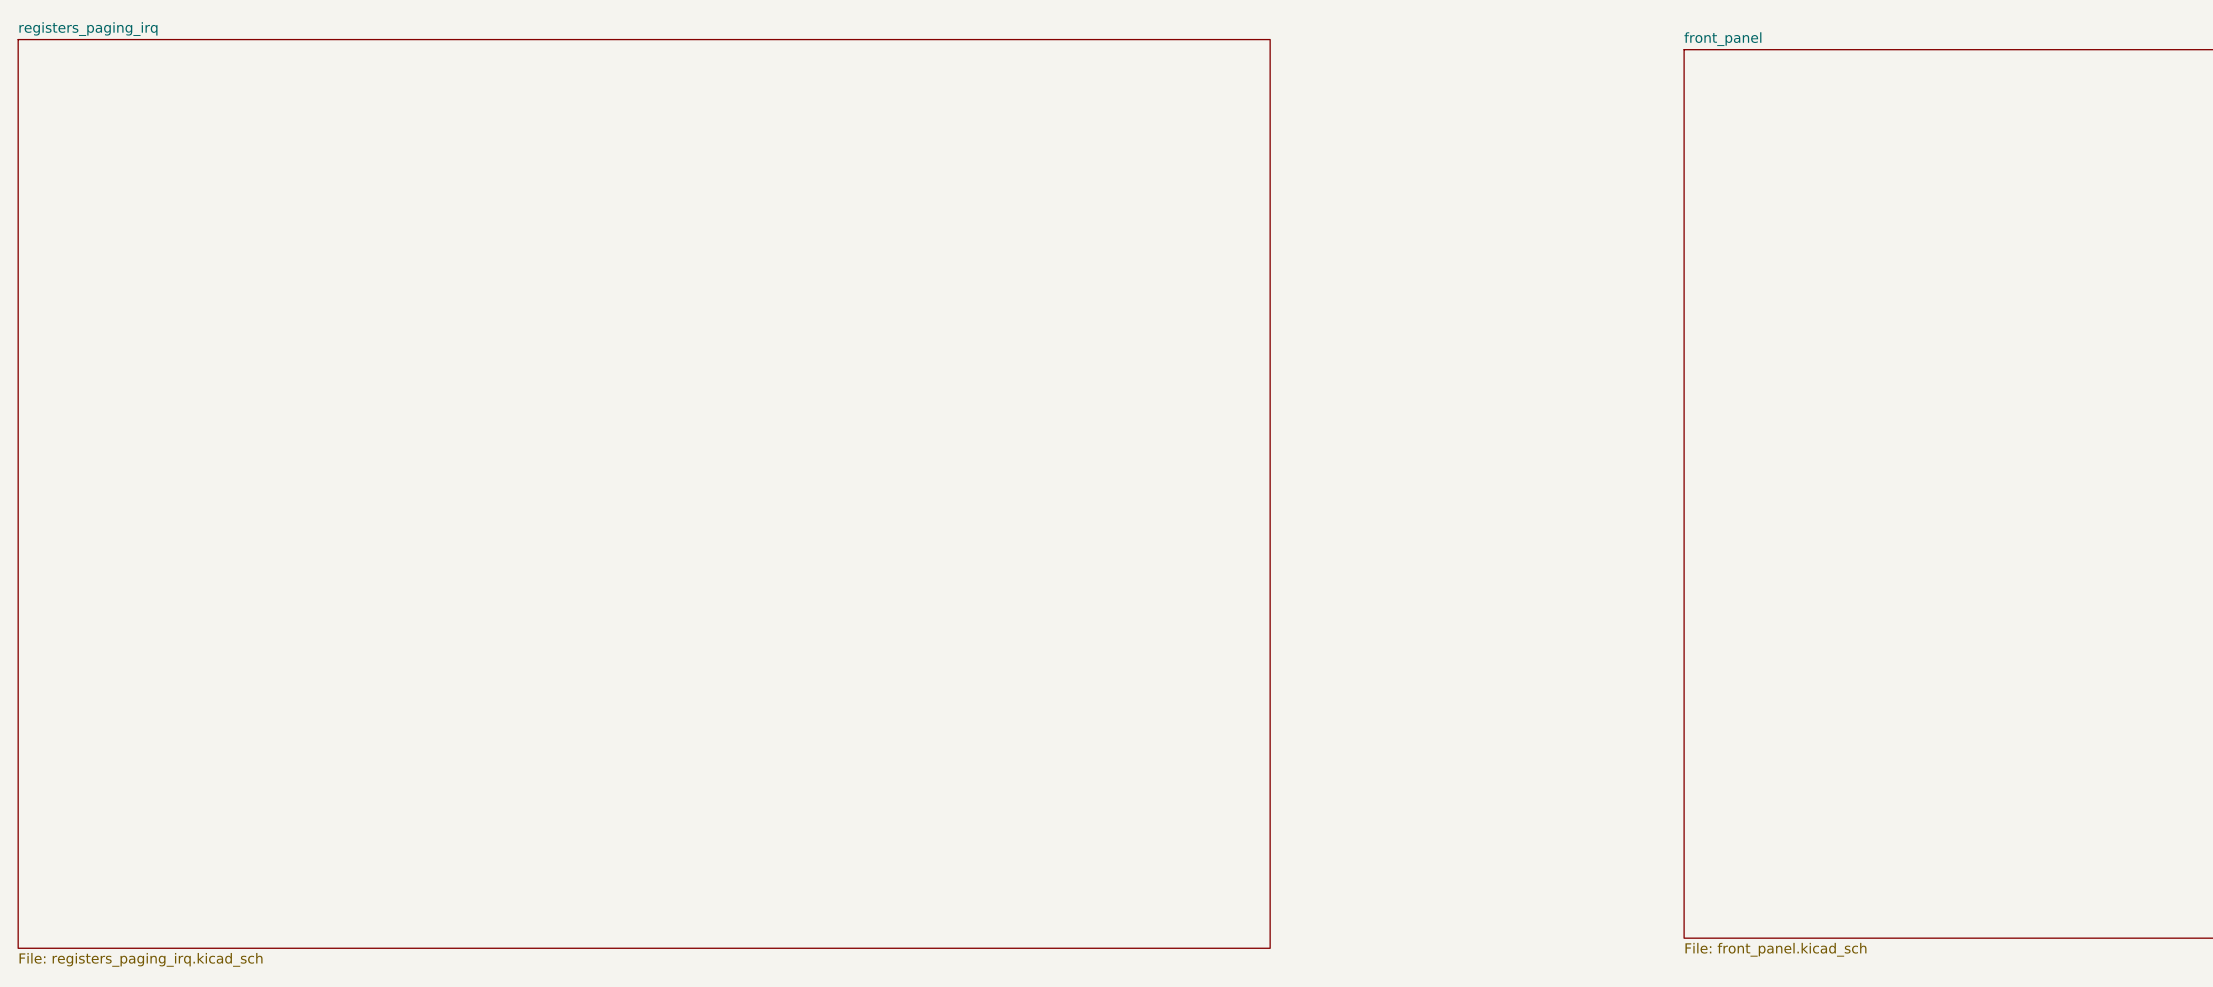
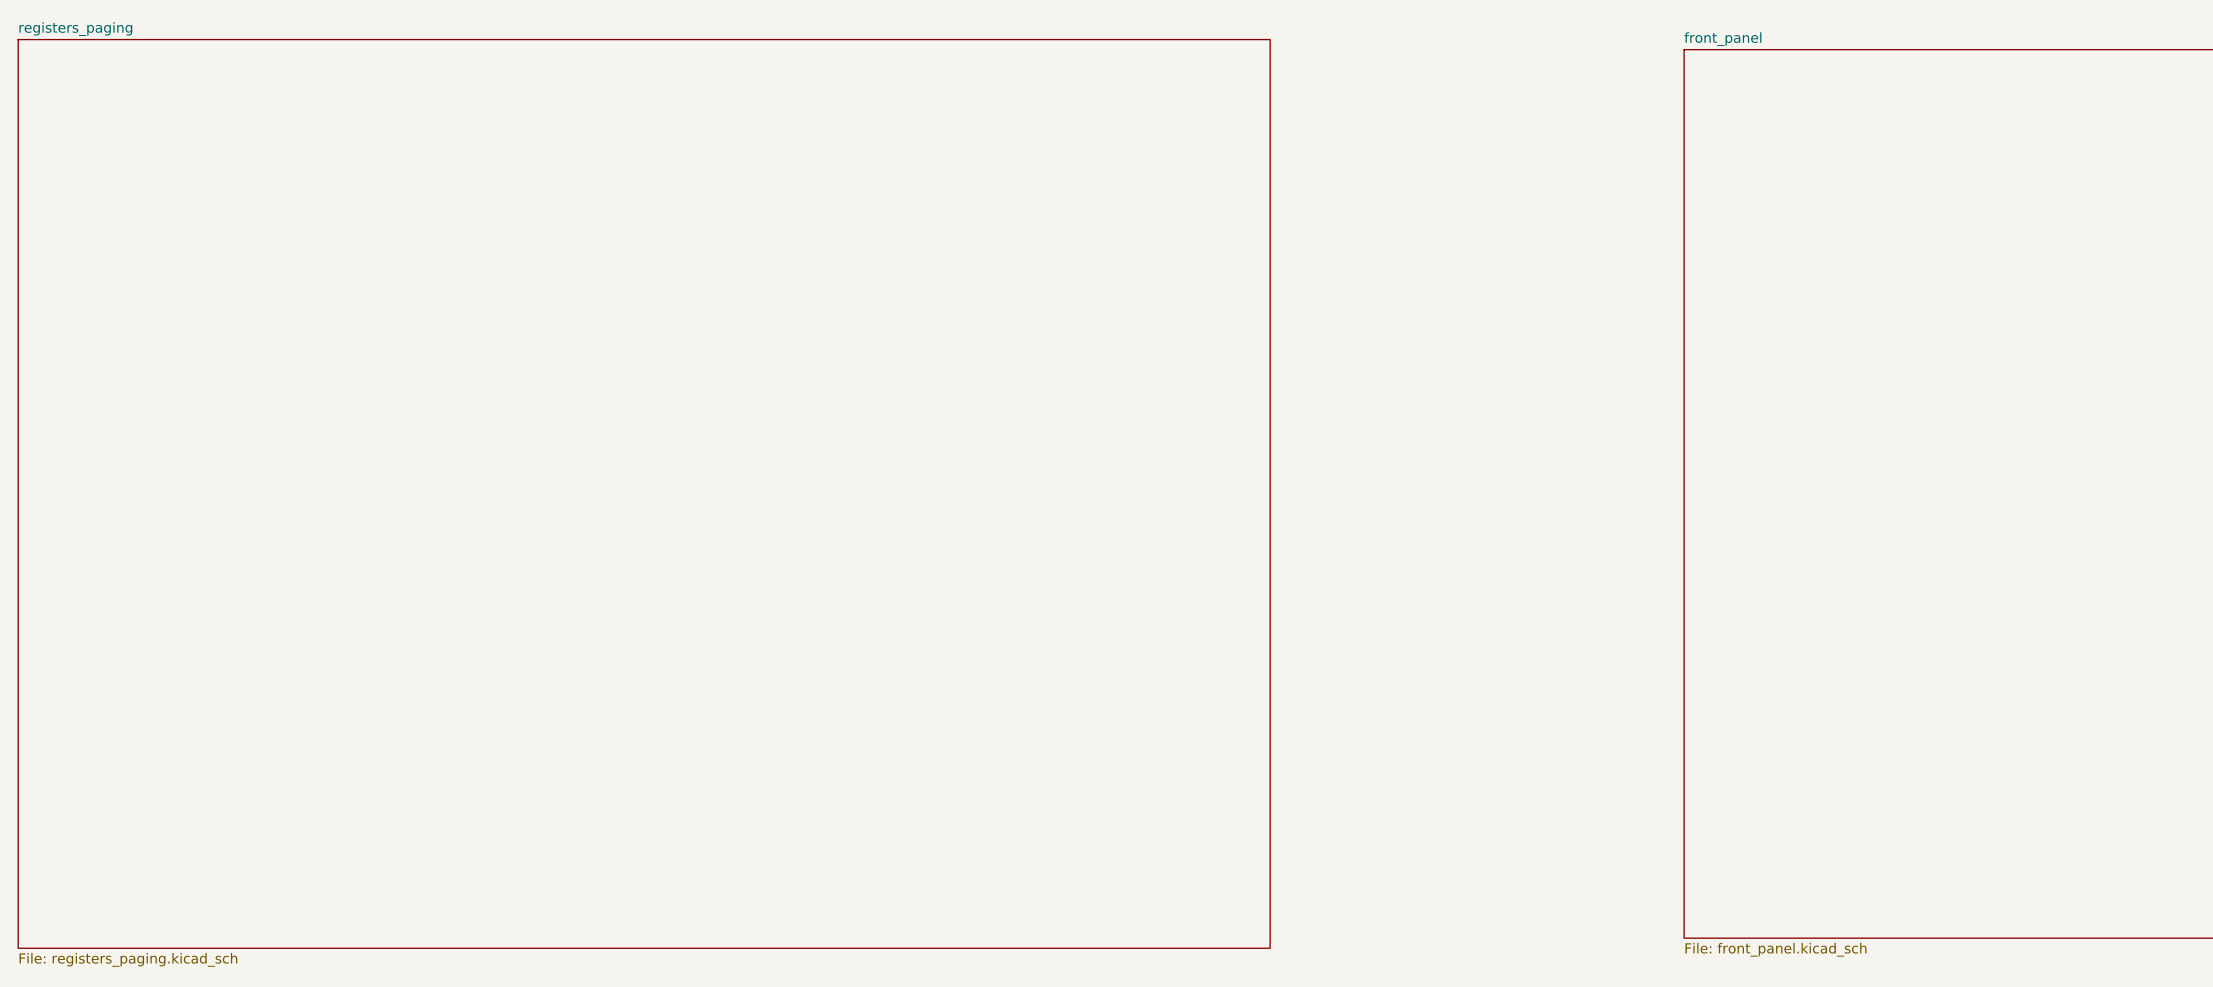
sheet registers_paging_irq name: registers_paging_irq (88, 29) -> registers_paging (75, 29)
sheet registers_paging_irq value: File: registers_paging_irq.kicad_sch (141, 959) -> File: registers_paging.kicad_sch (128, 959)

